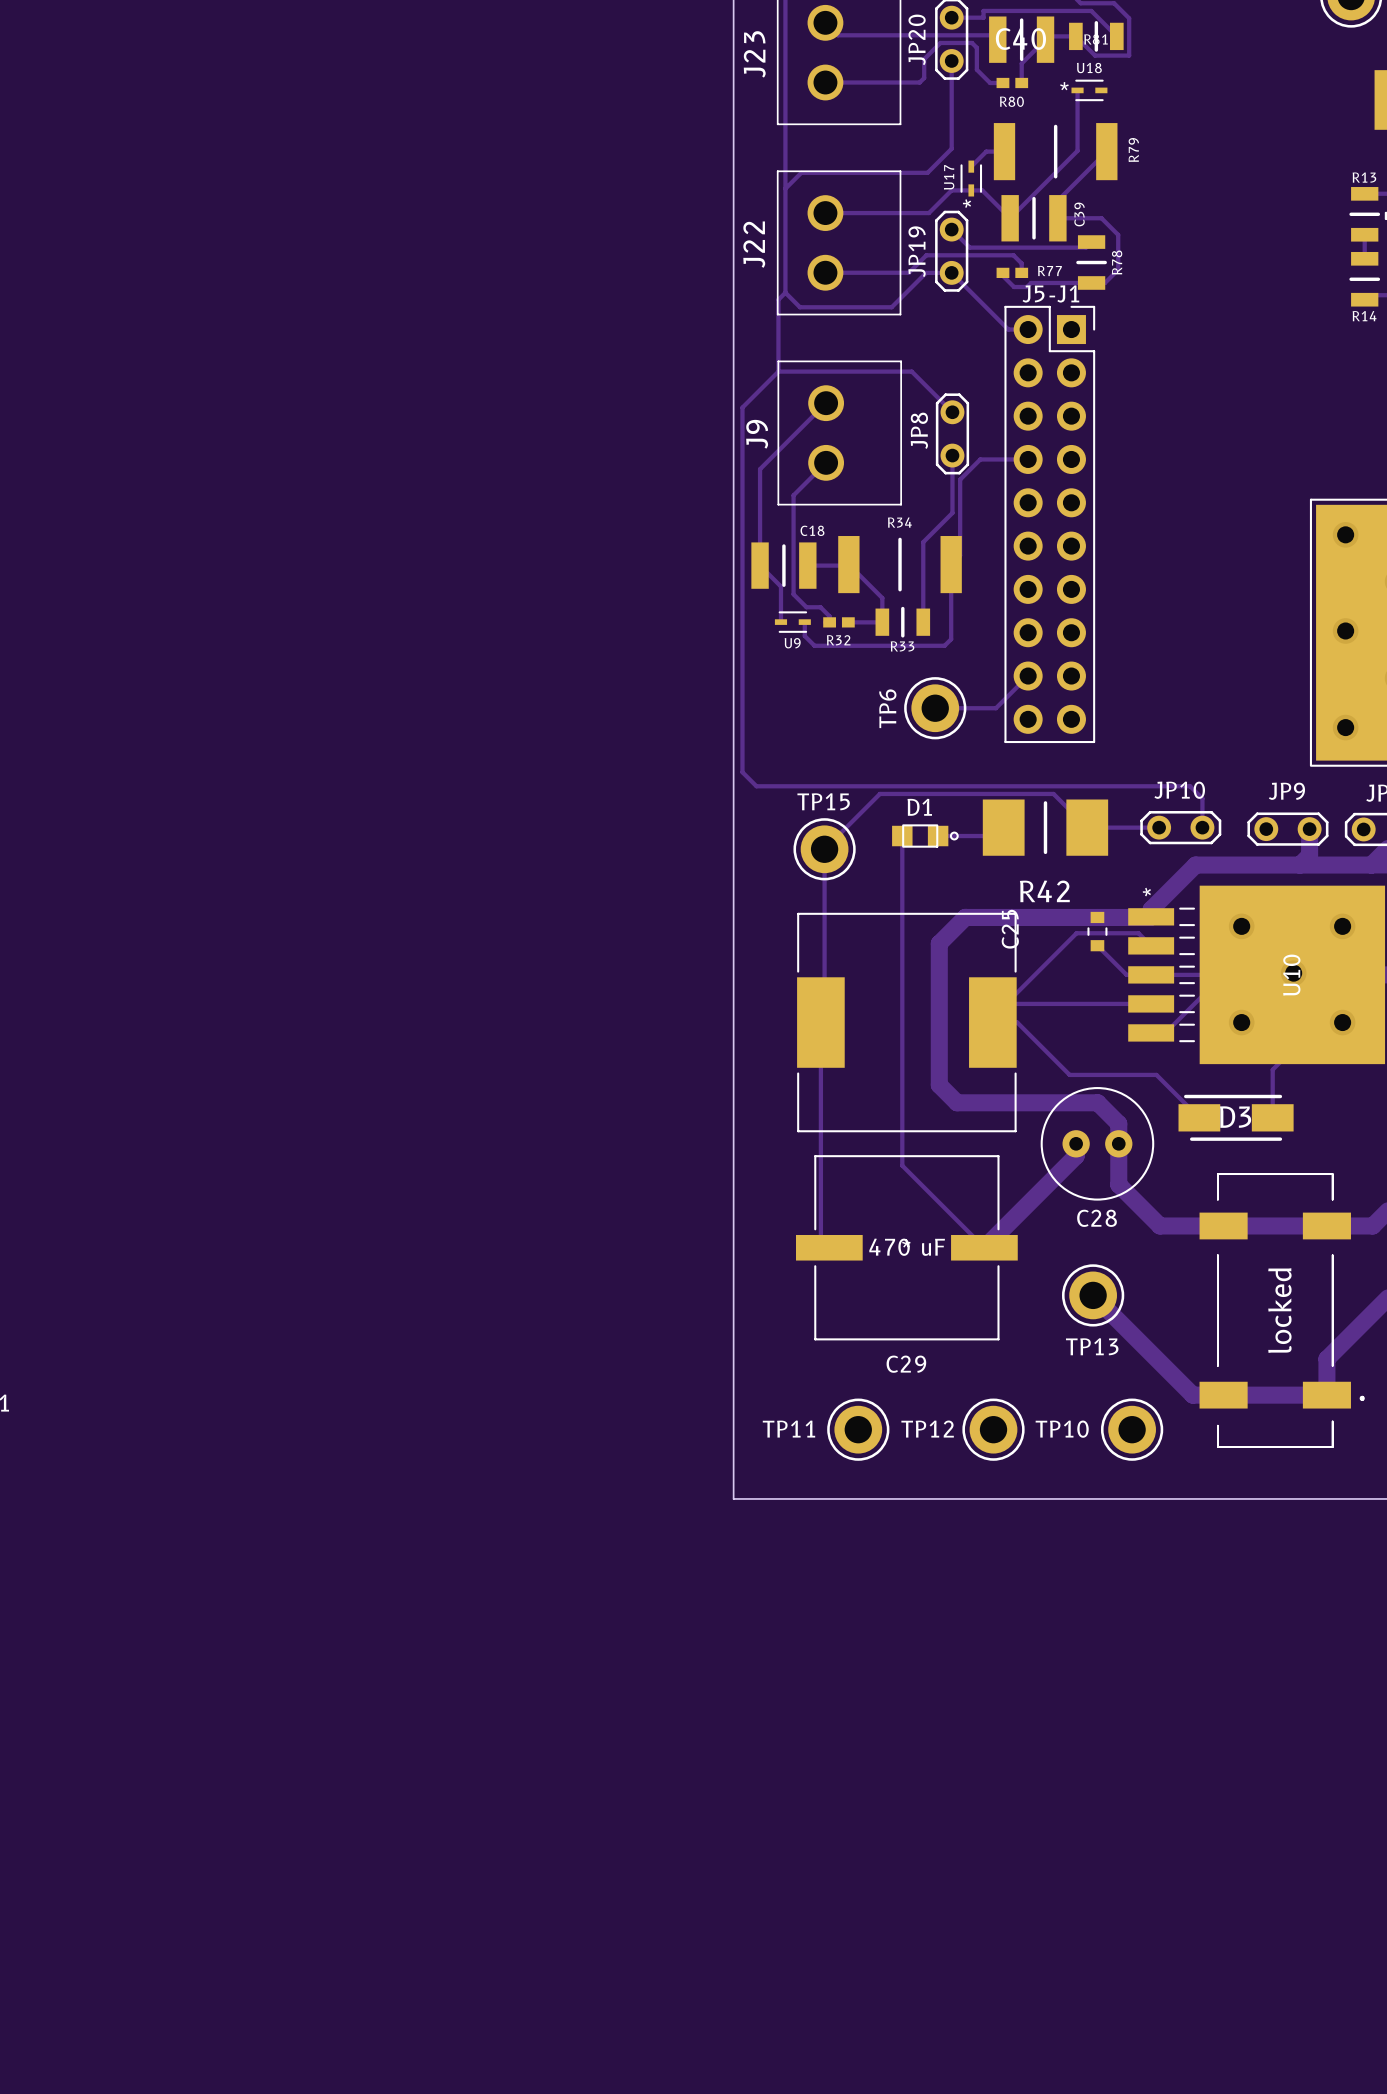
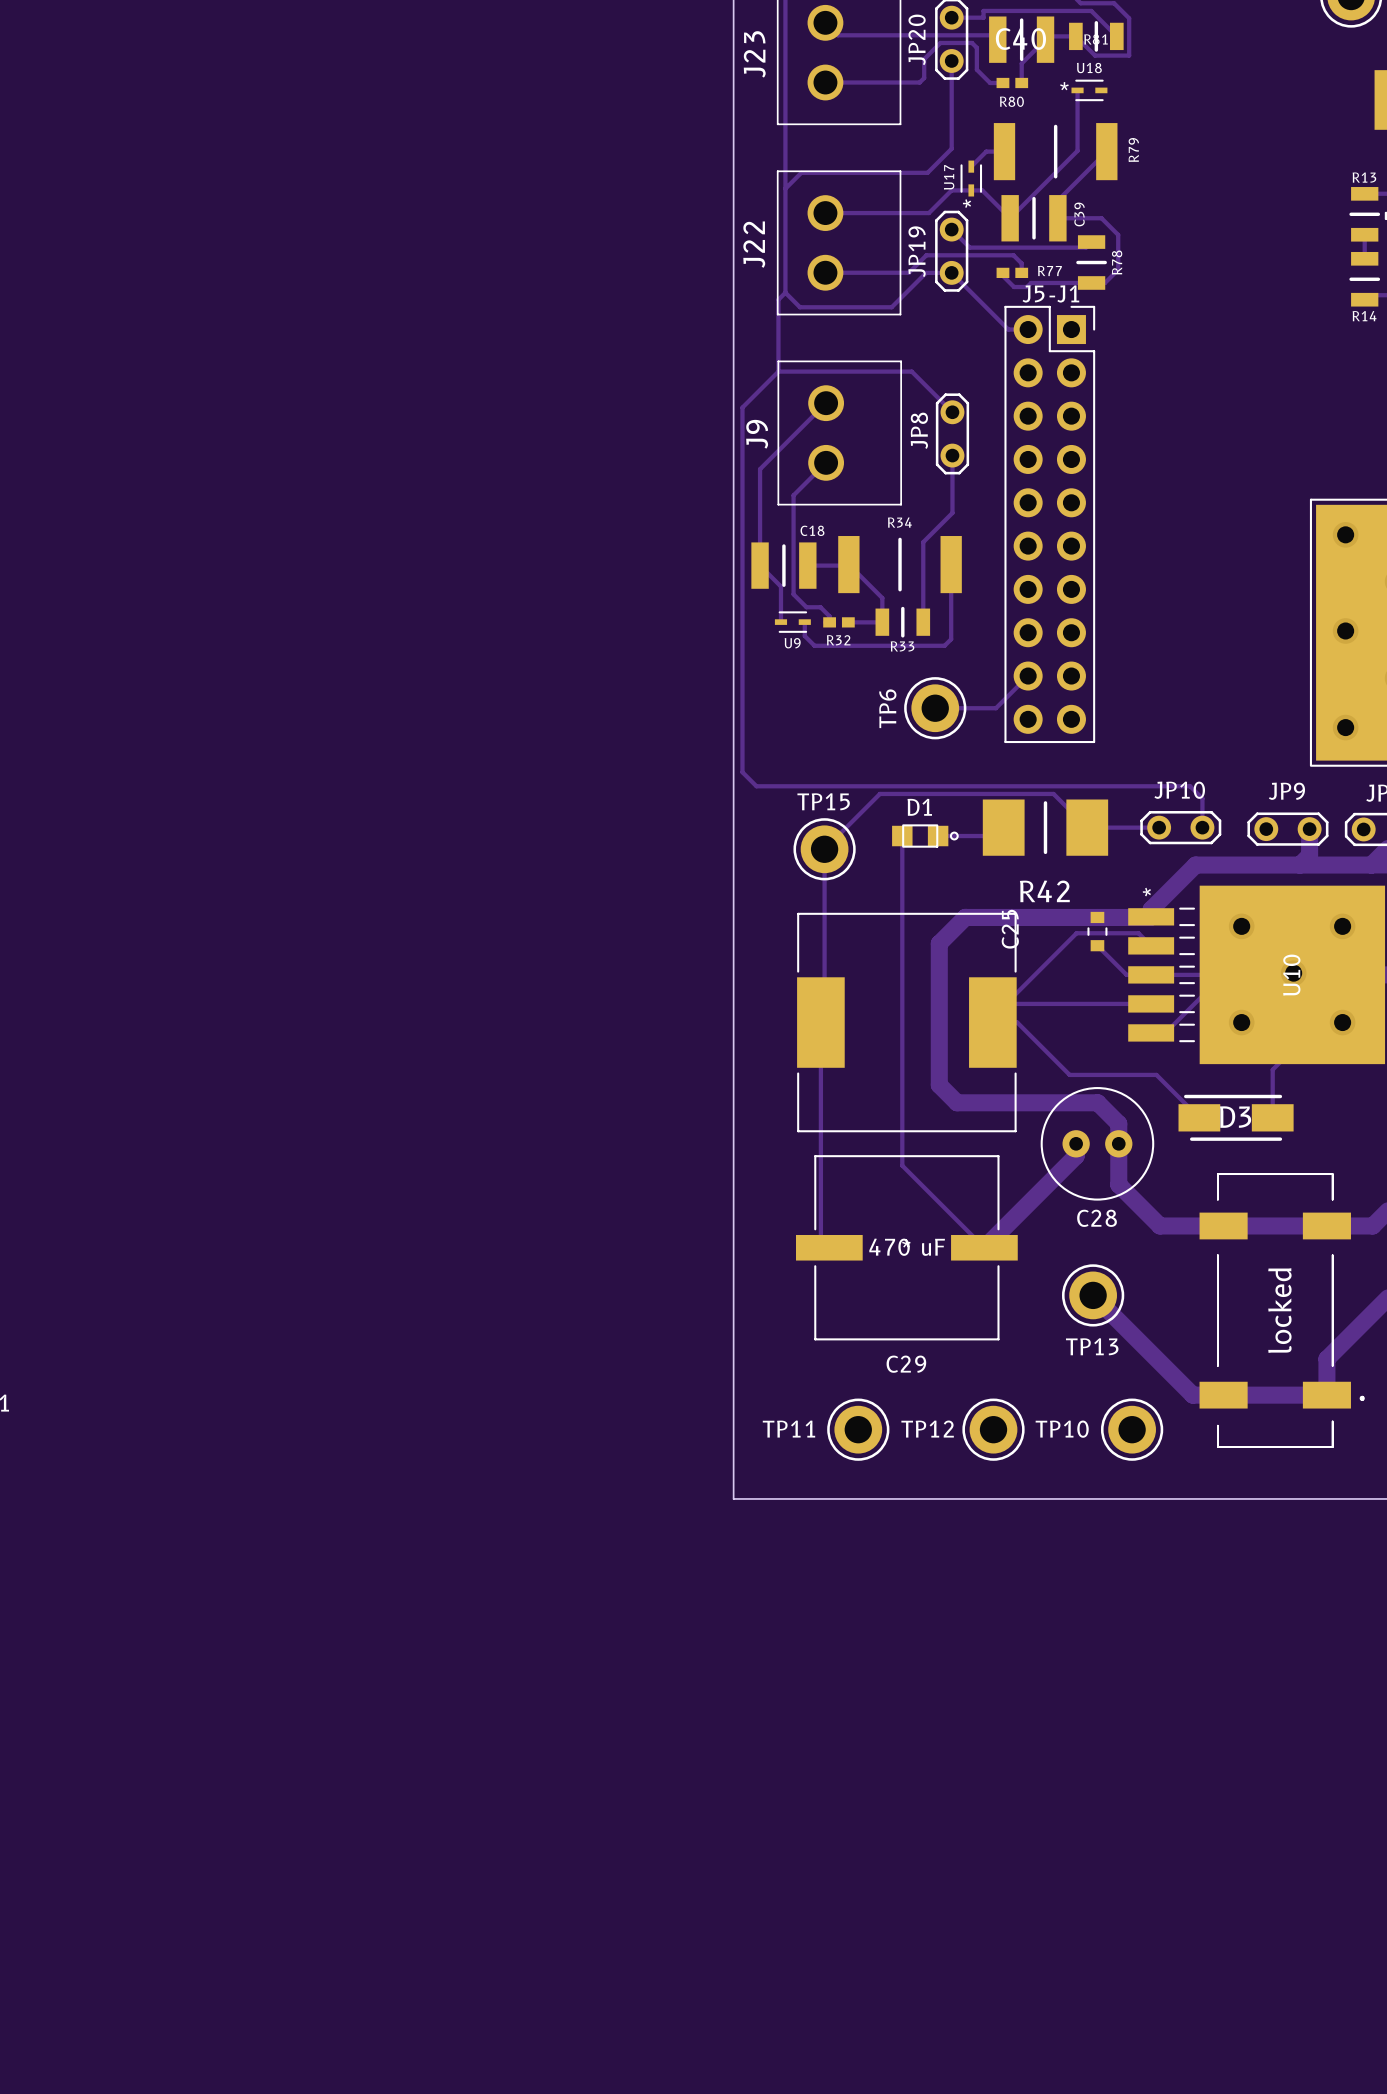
track: (1028, 459) (980, 459) (960, 479) (960, 555) (951, 564) -> none

